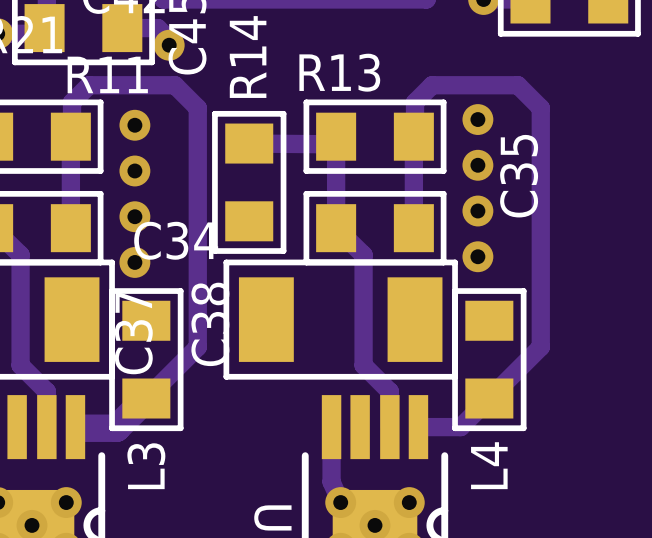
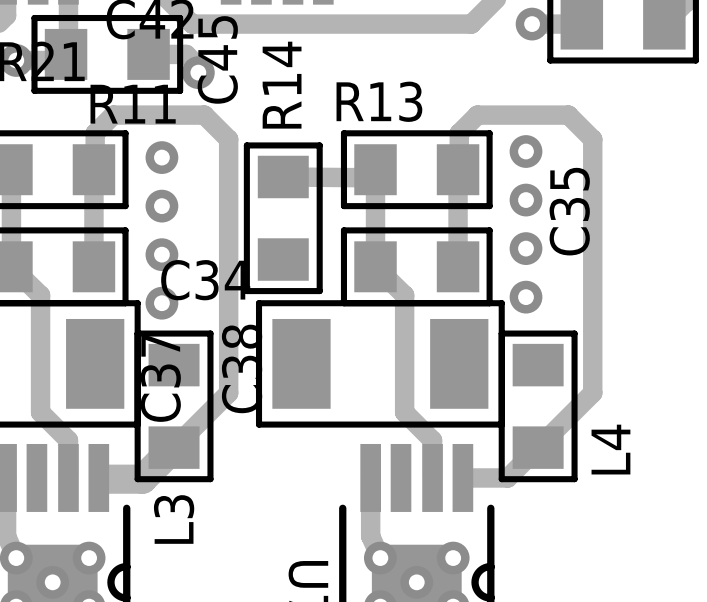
L4 name position: L4 (489, 465) -> L4 (610, 449)

